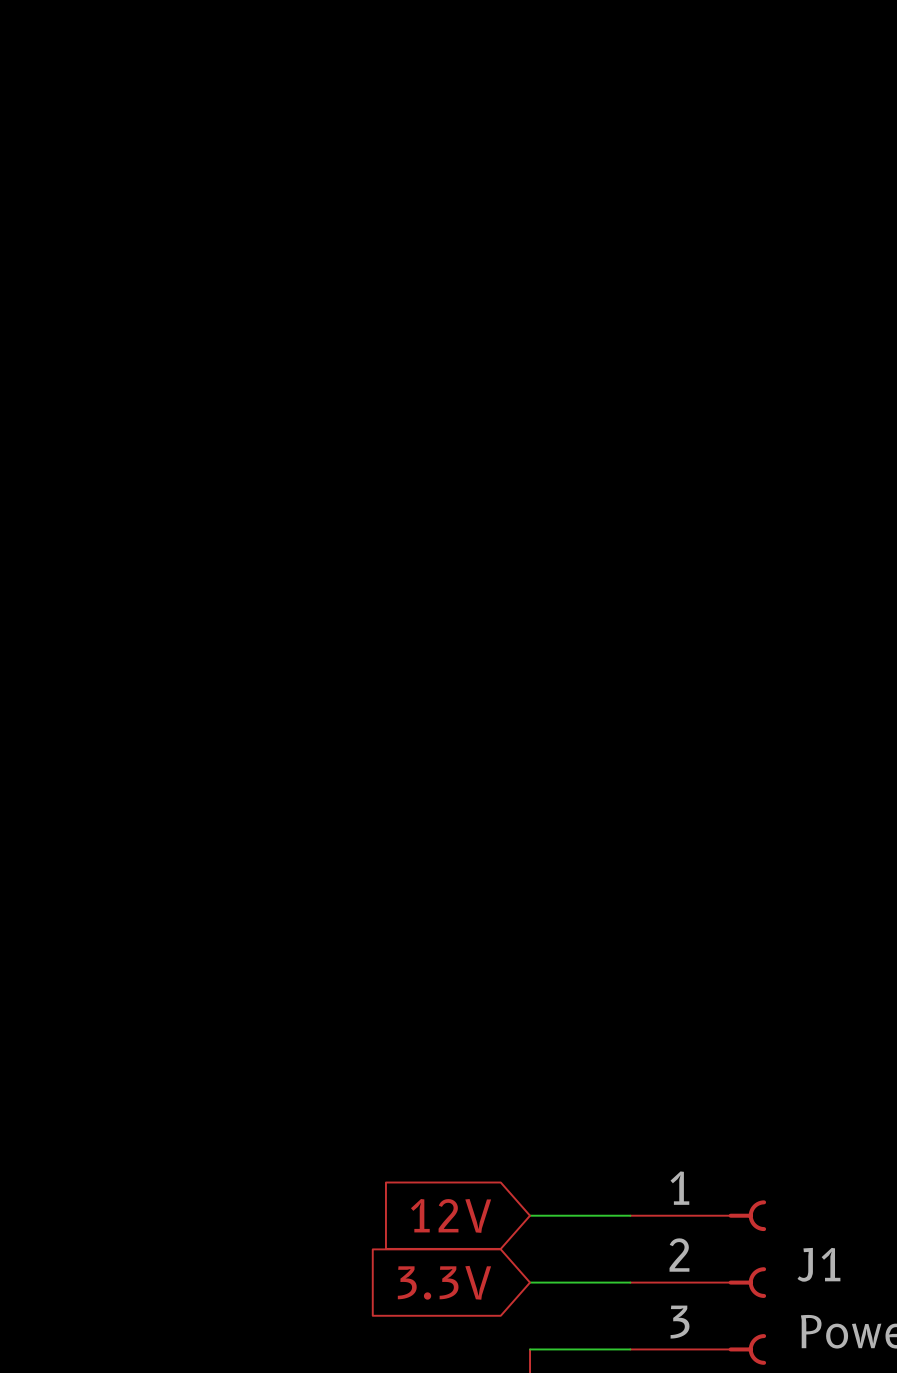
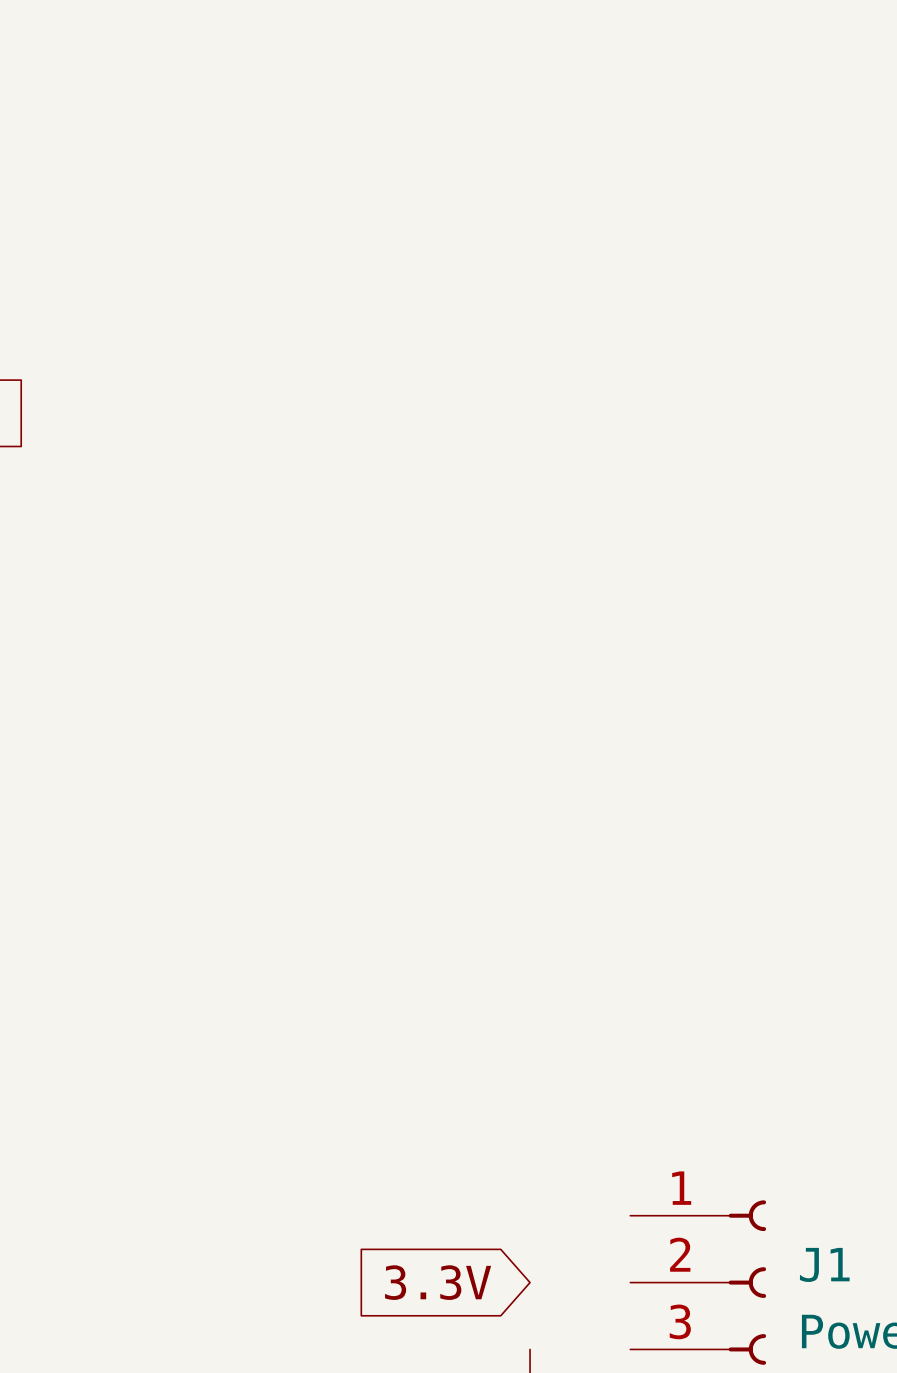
global label: 12V (451, 1215) -> none
wire: (530, 1215) (630, 1215) -> none
wire: (530, 1282) (630, 1282) -> none
wire: (530, 1349) (630, 1349) -> none

